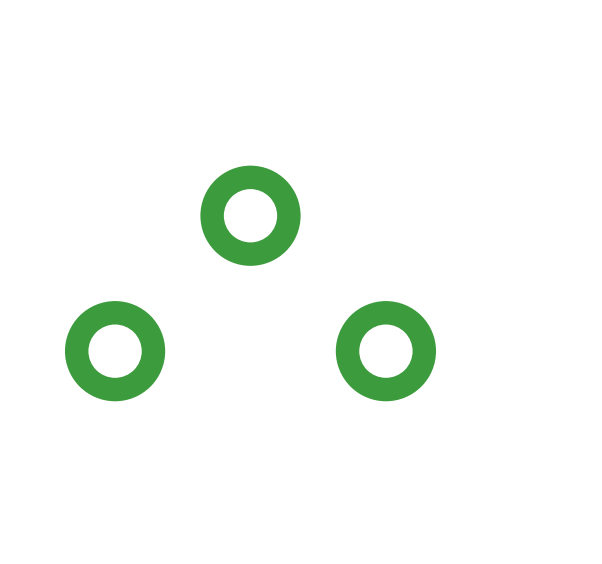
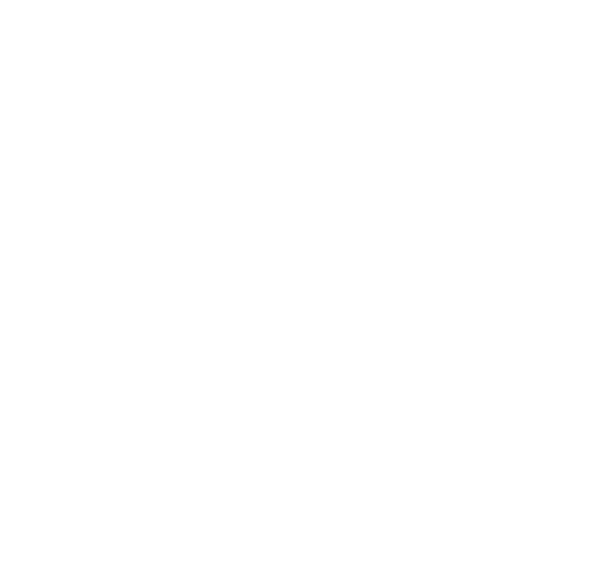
part: (250, 283) -> none

